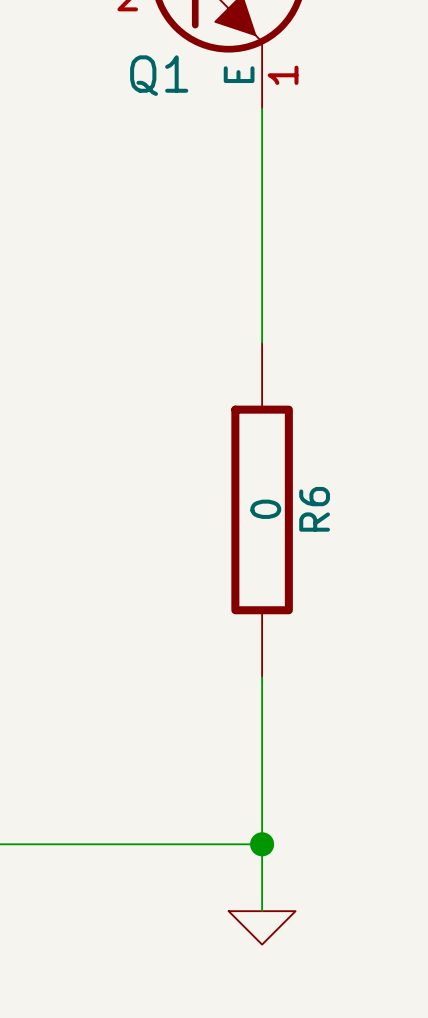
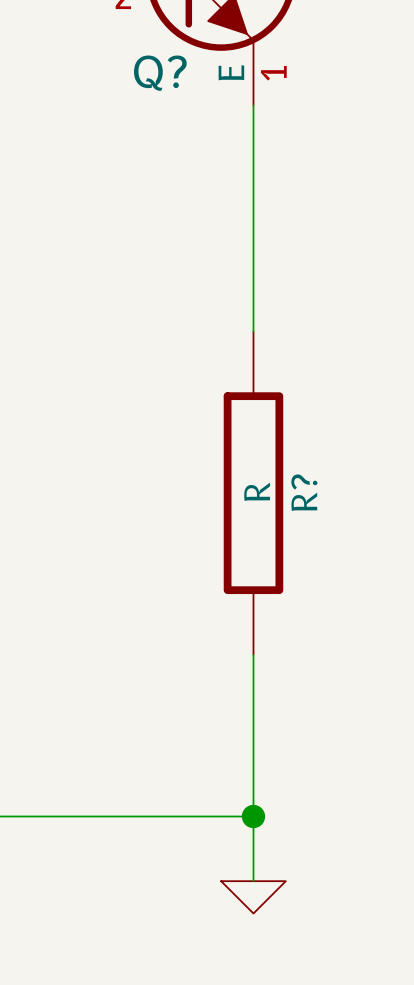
Q1 name: Q1 (159, 75) -> Q? (160, 73)
R6 value: 0 (265, 509) -> R (257, 491)
R6 name: R6 (314, 509) -> R? (304, 492)

